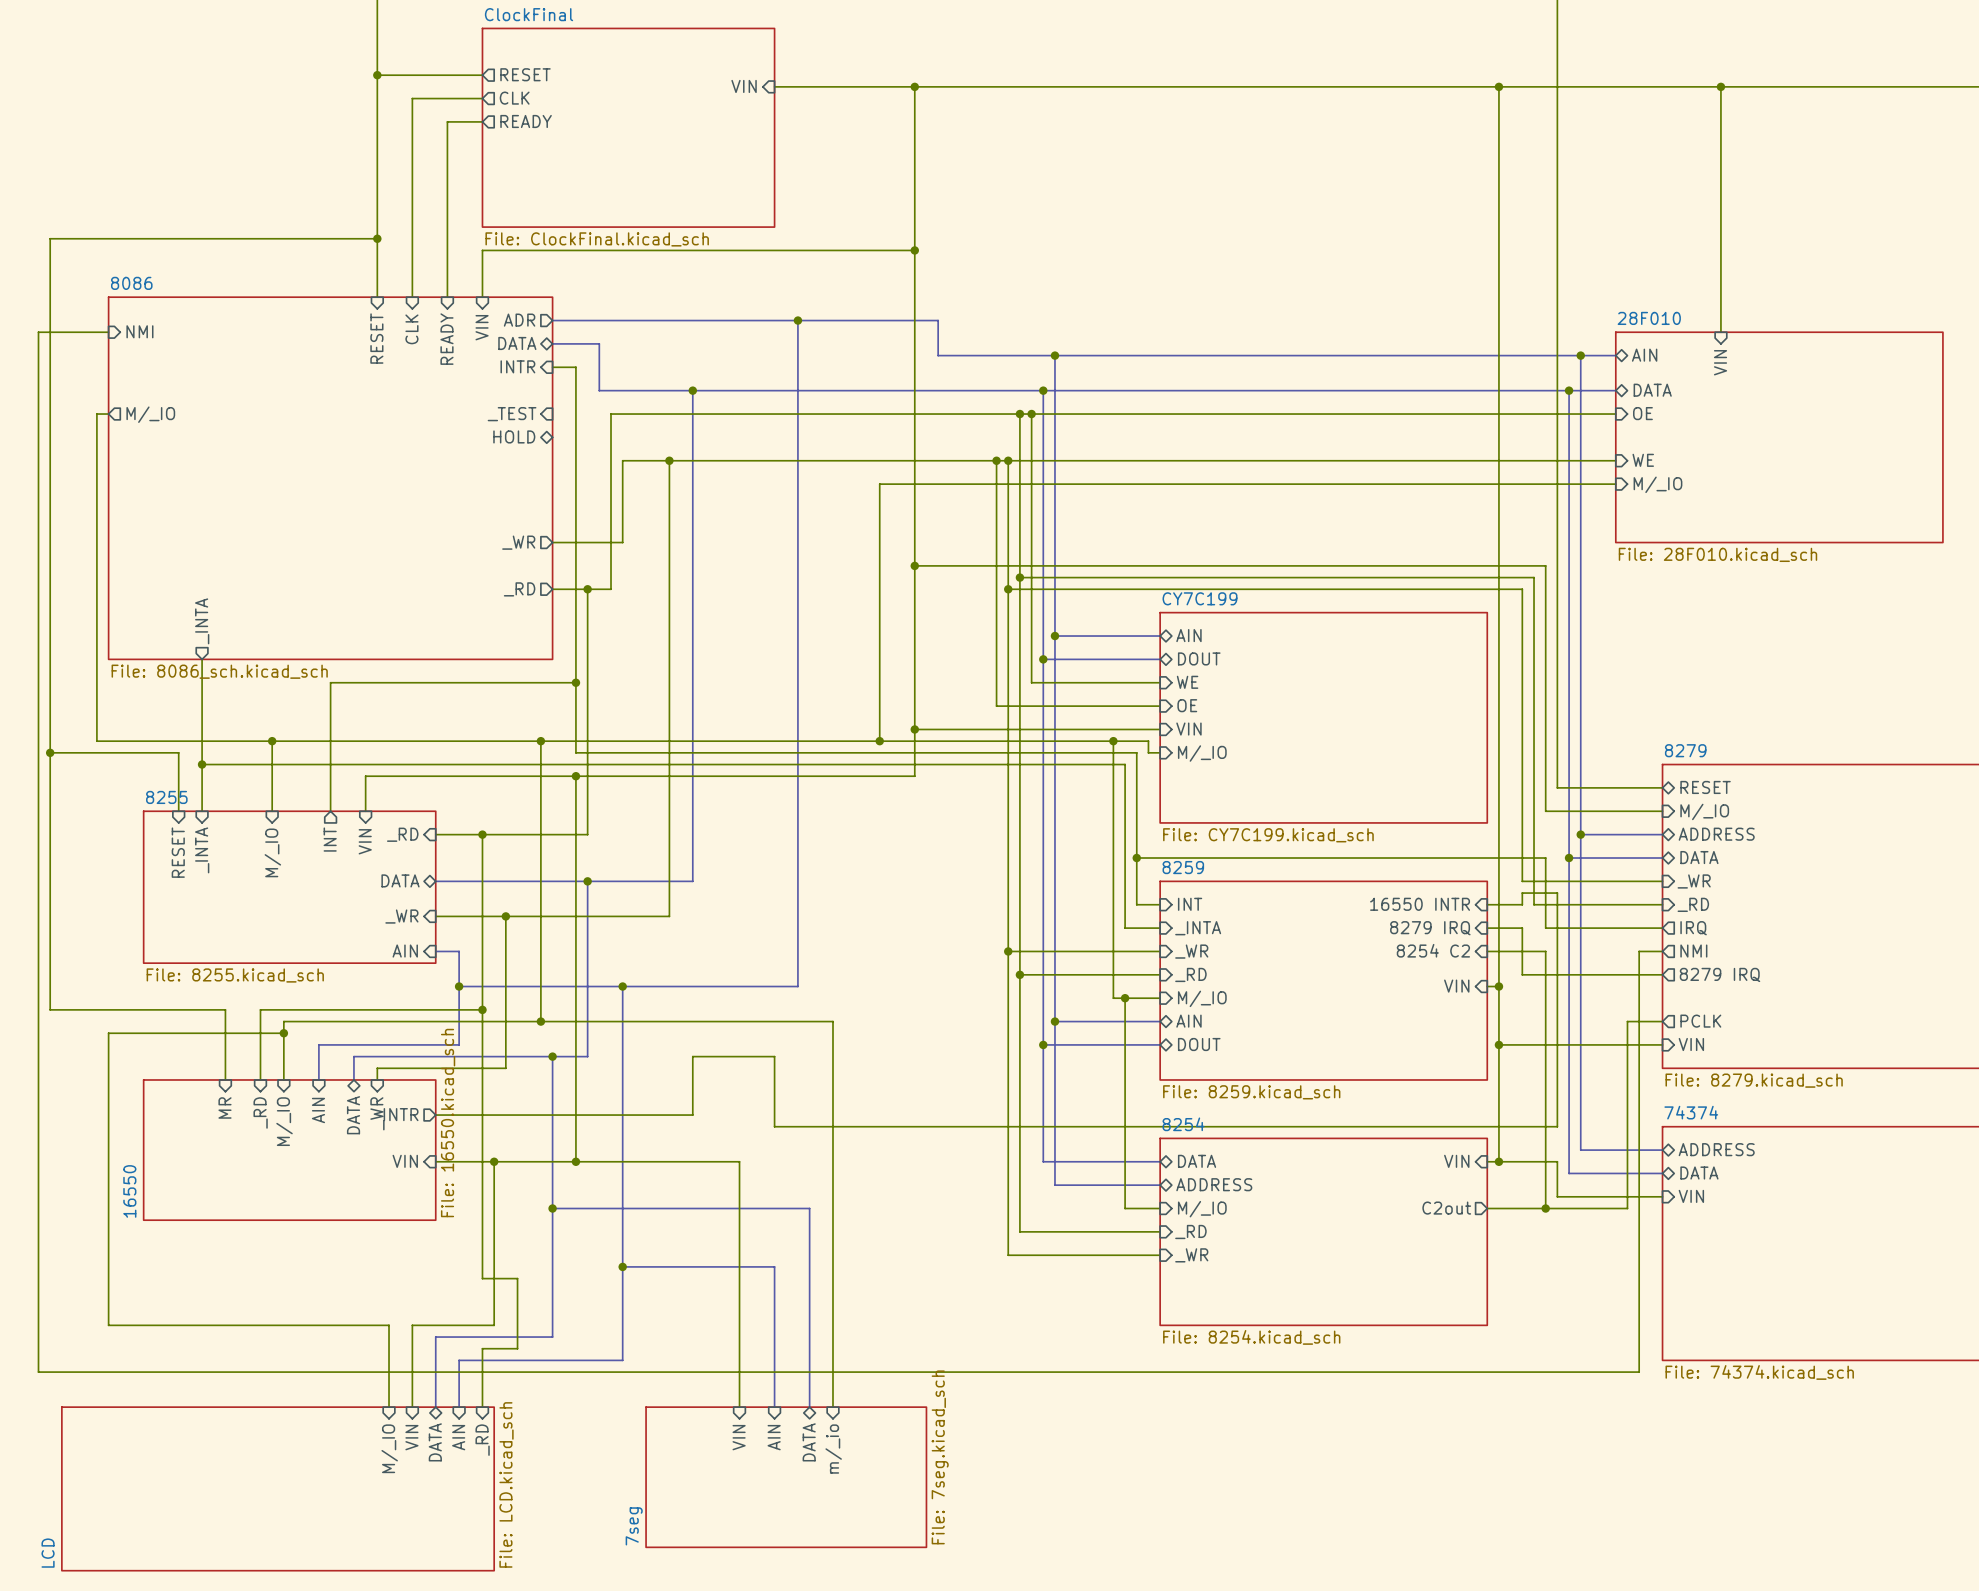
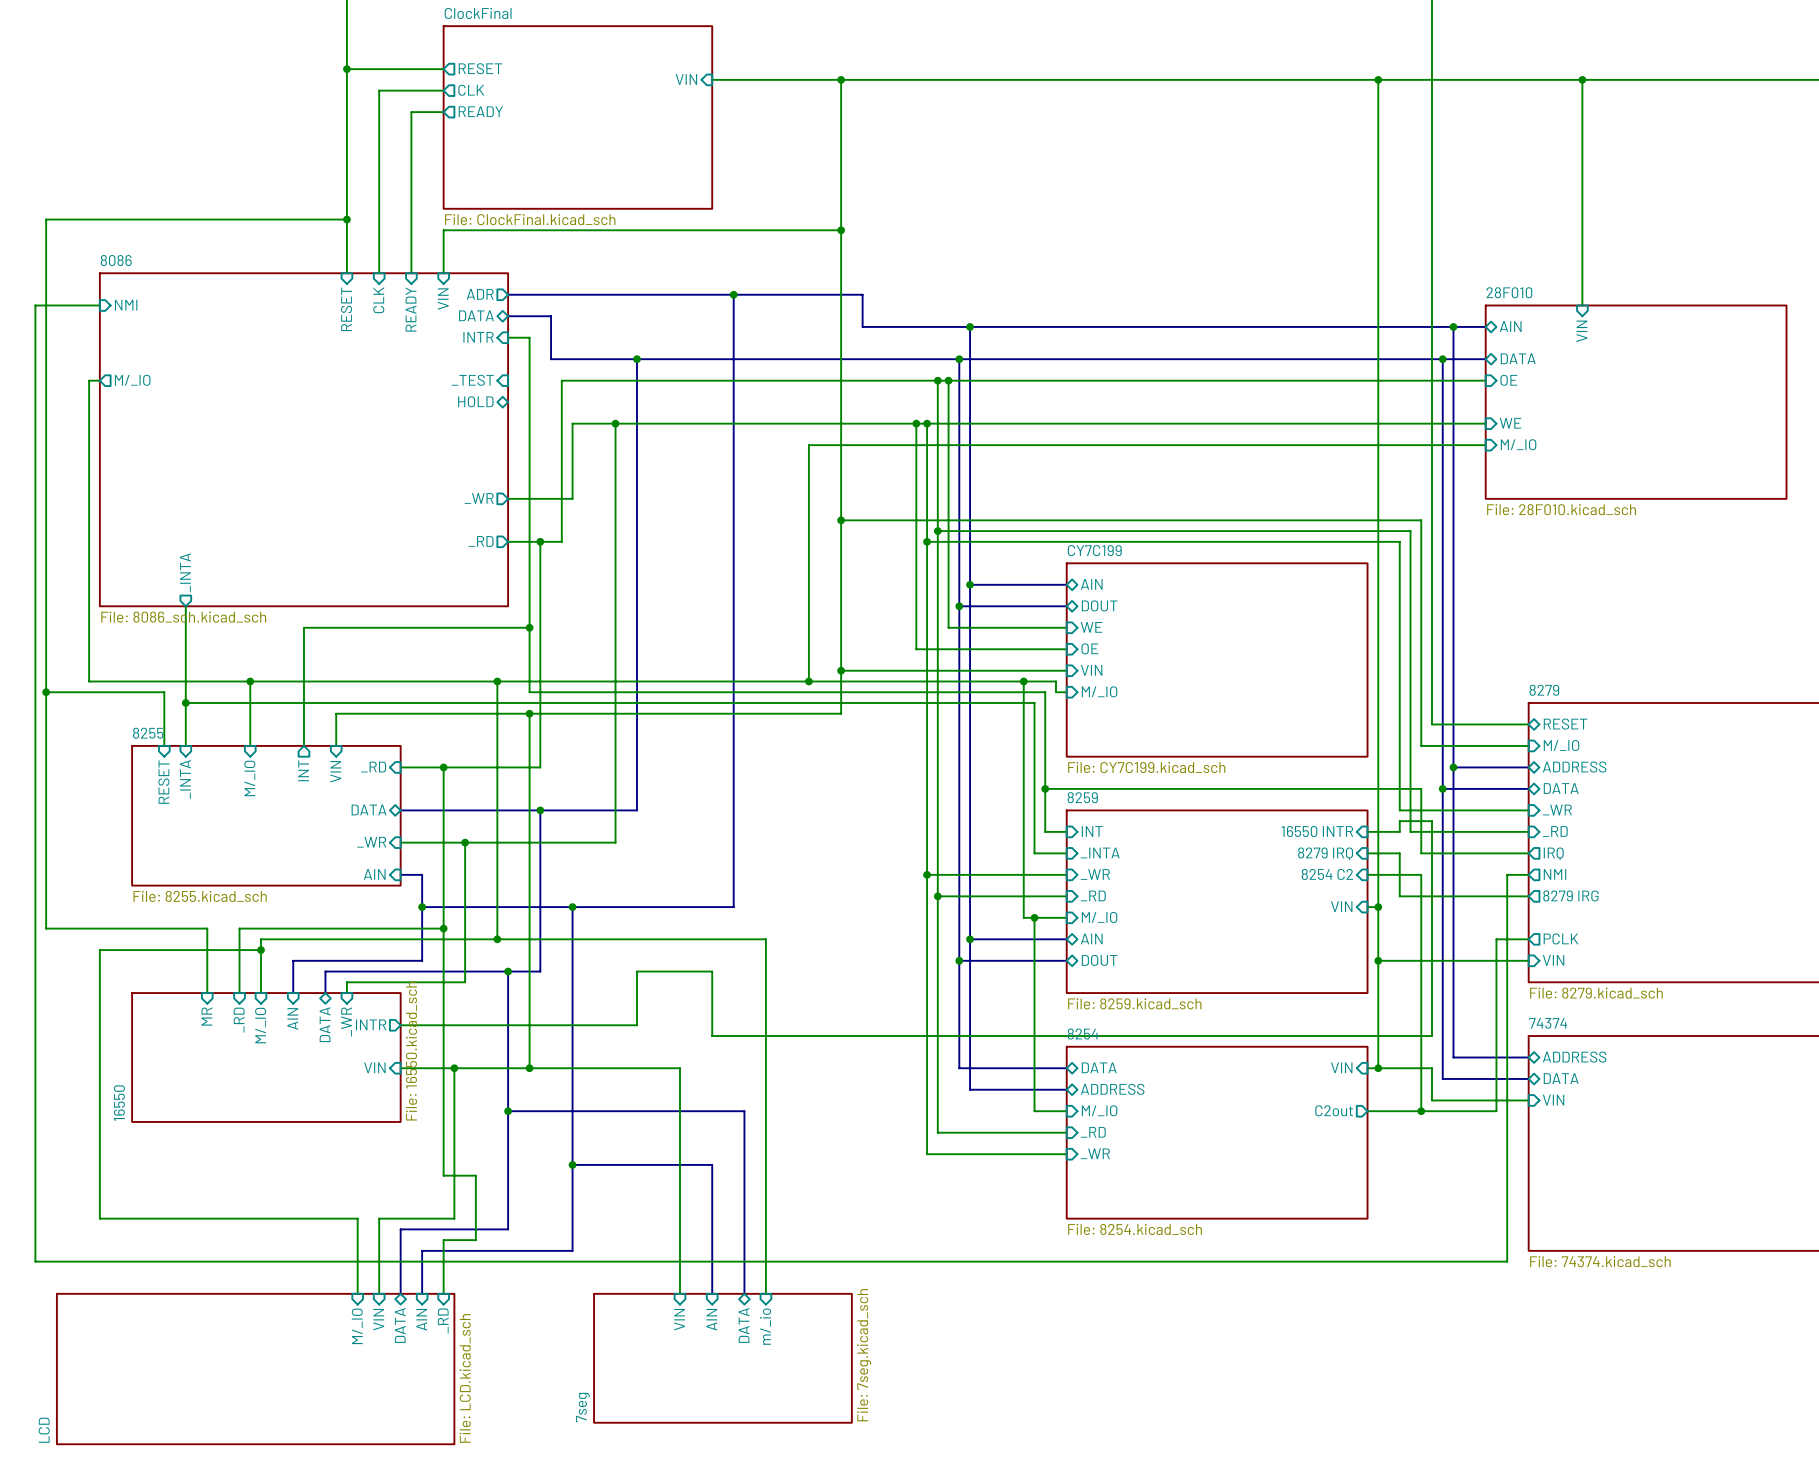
sheet pin: 8279 IRQ (1720, 974) -> 8279 IRG (1570, 895)

